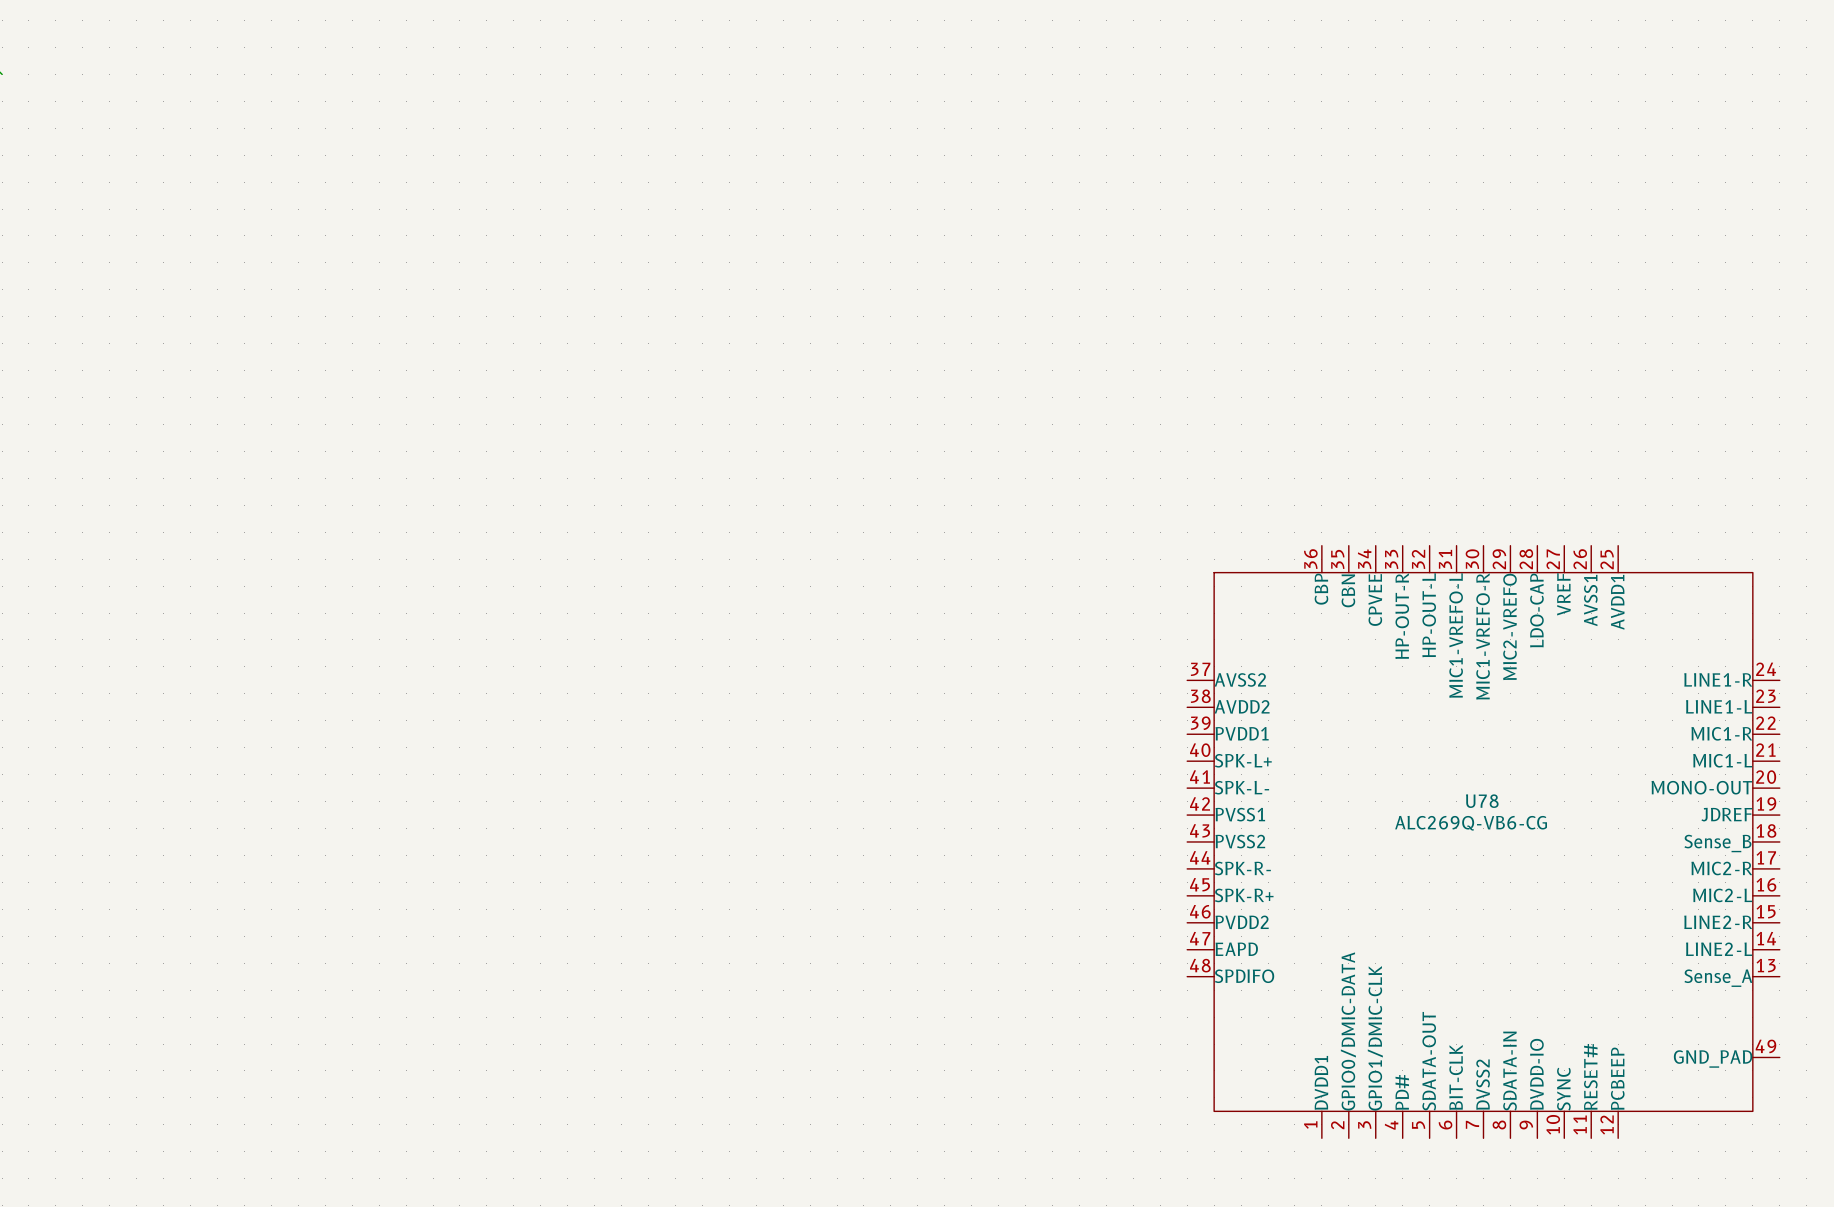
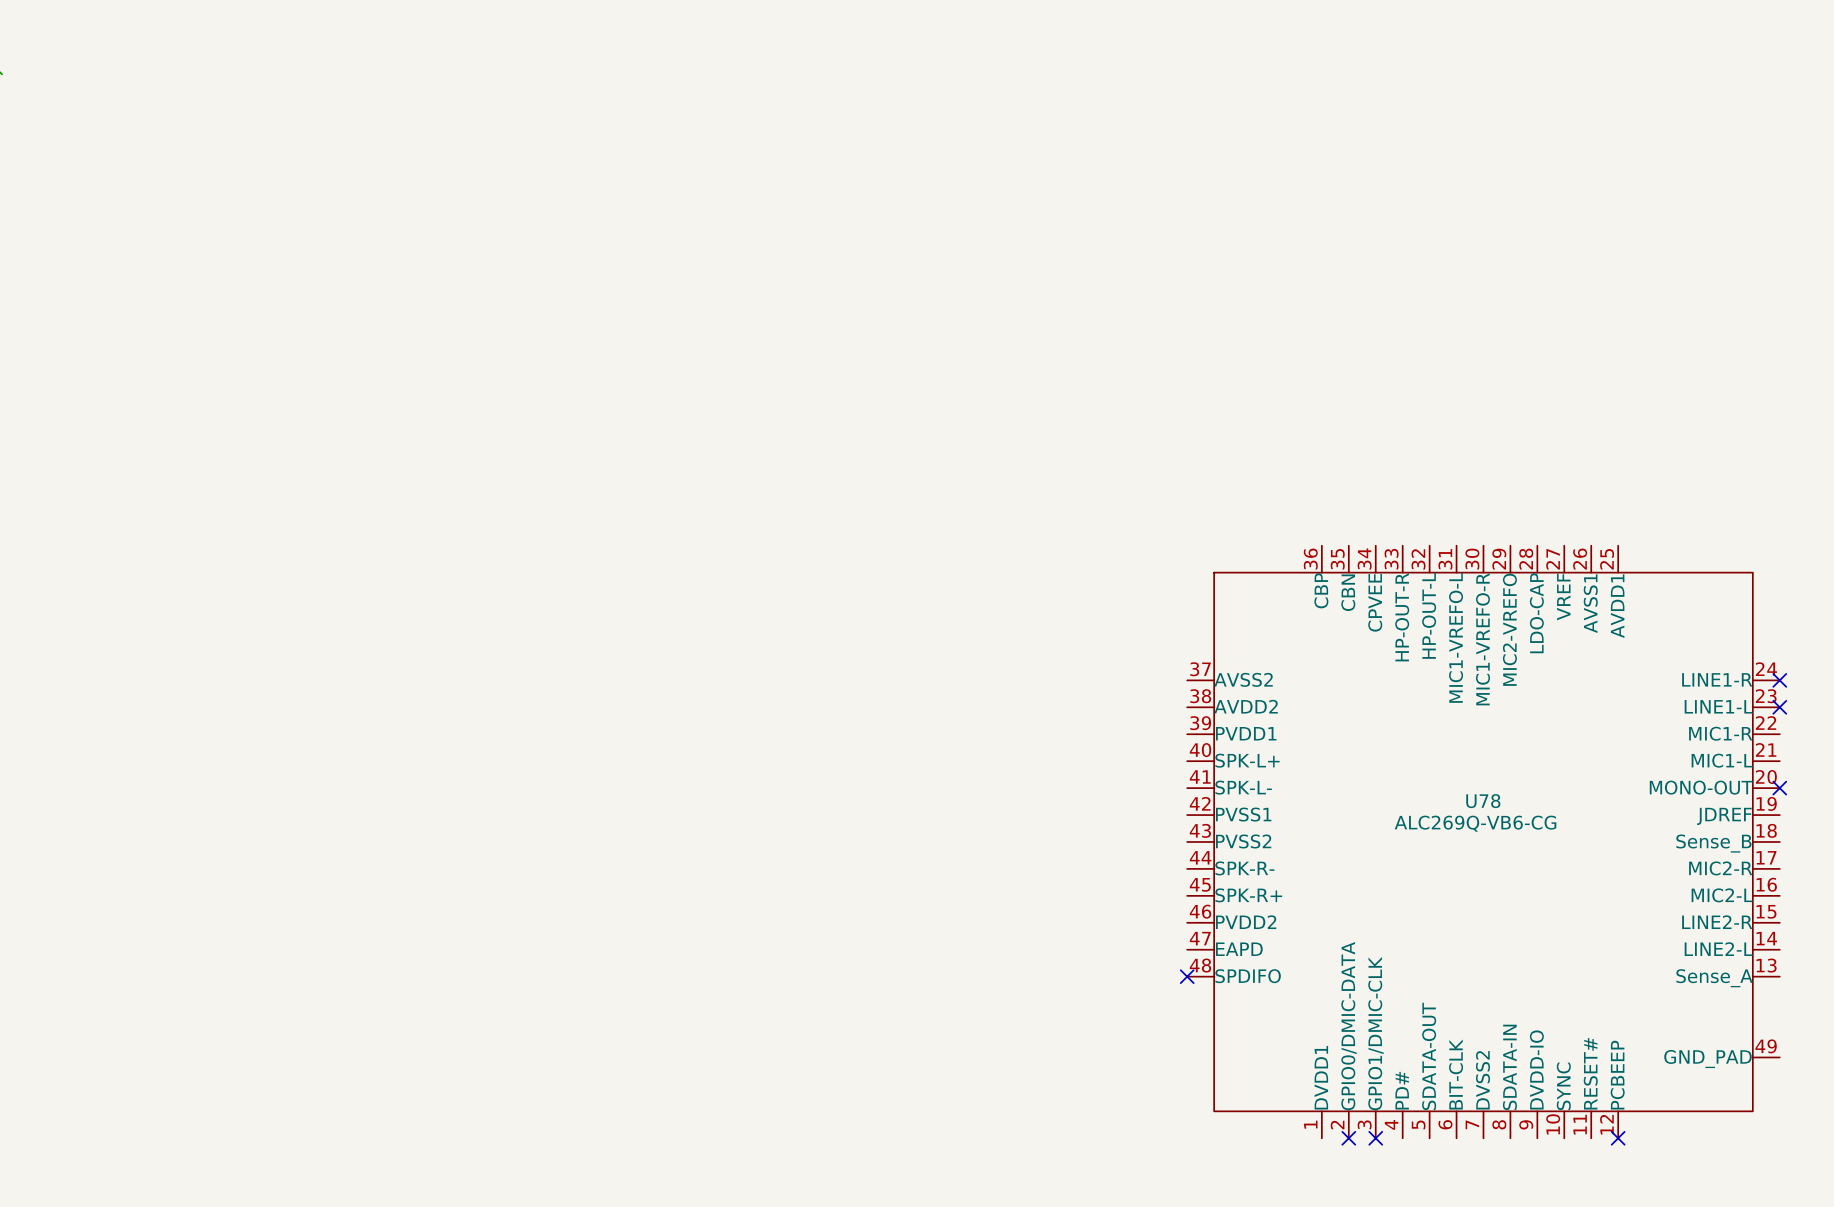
no-connect mark: none -> (1779, 680)
no-connect mark: none -> (1779, 707)
no-connect mark: none -> (1779, 788)
no-connect mark: none -> (1187, 976)
no-connect mark: none -> (1348, 1138)
no-connect mark: none -> (1375, 1138)
no-connect mark: none -> (1618, 1138)

